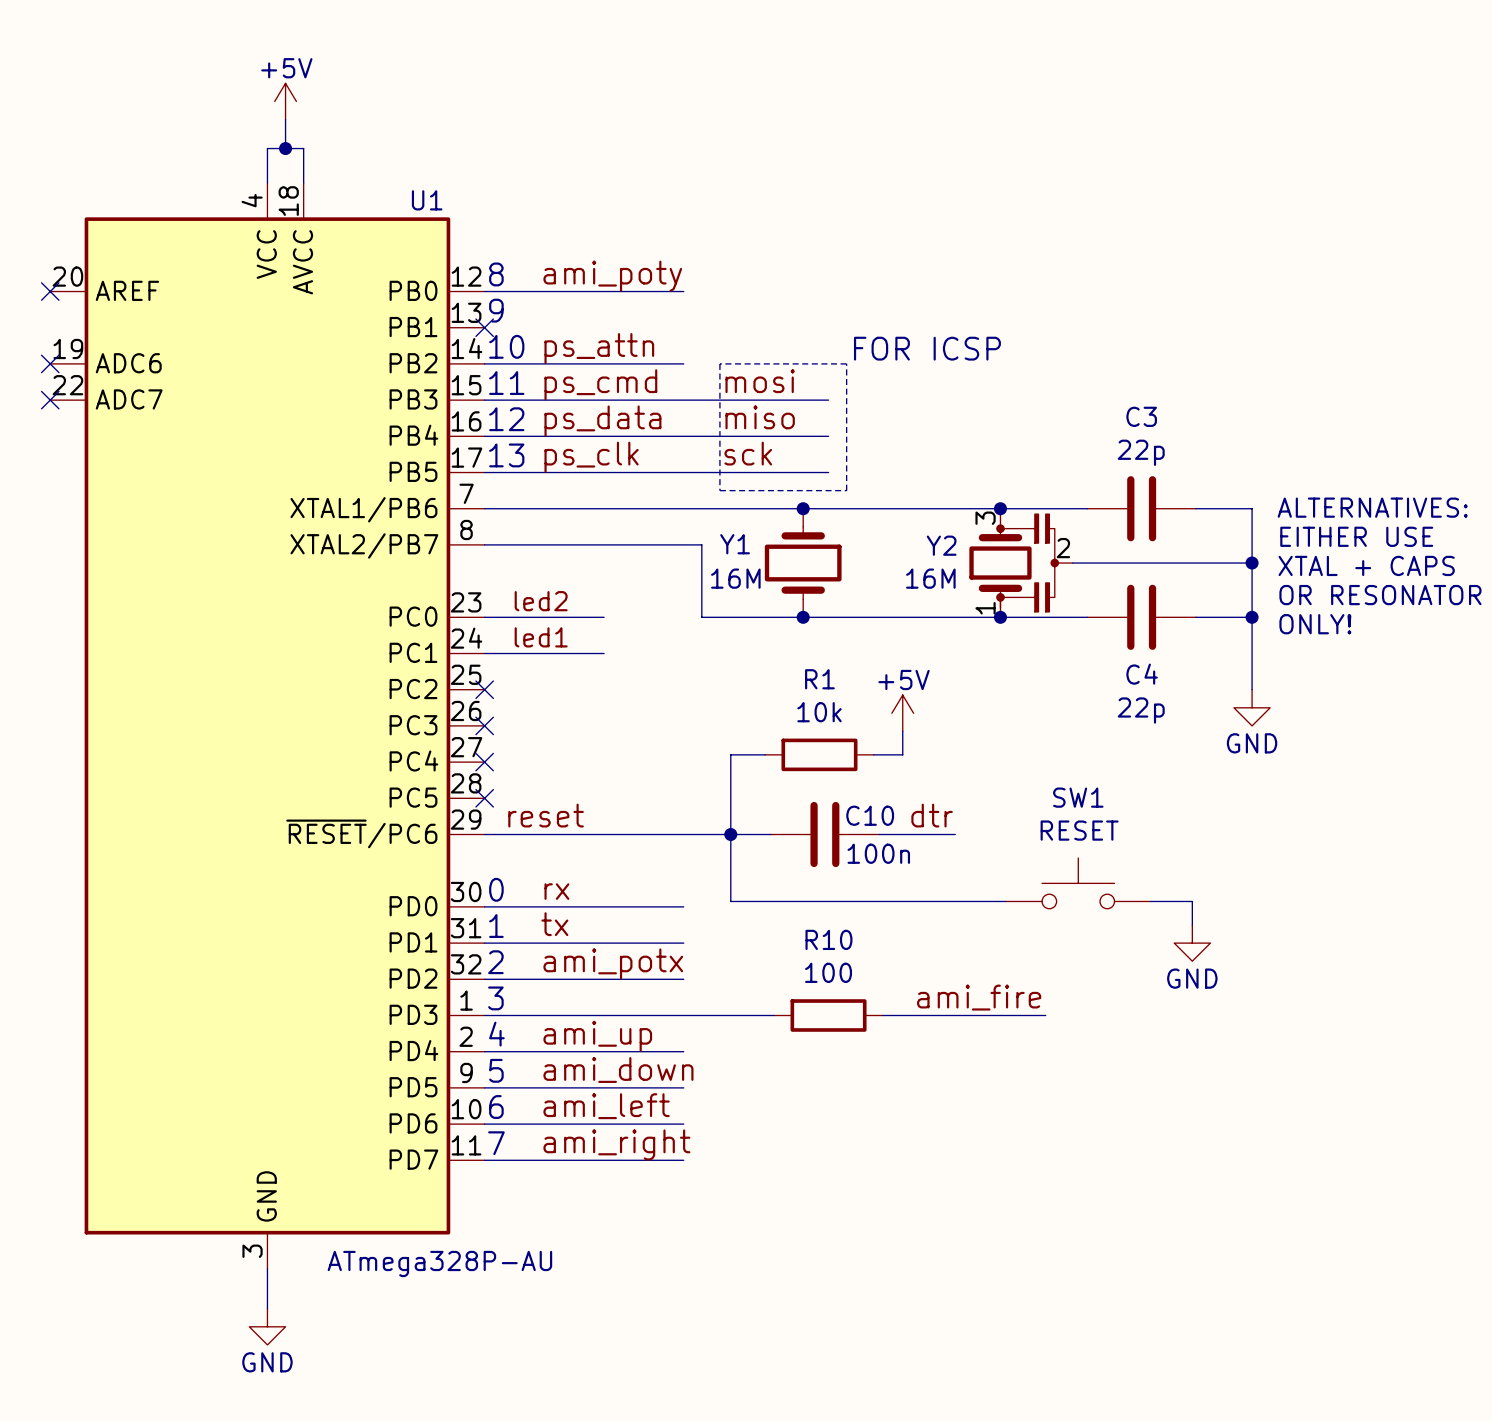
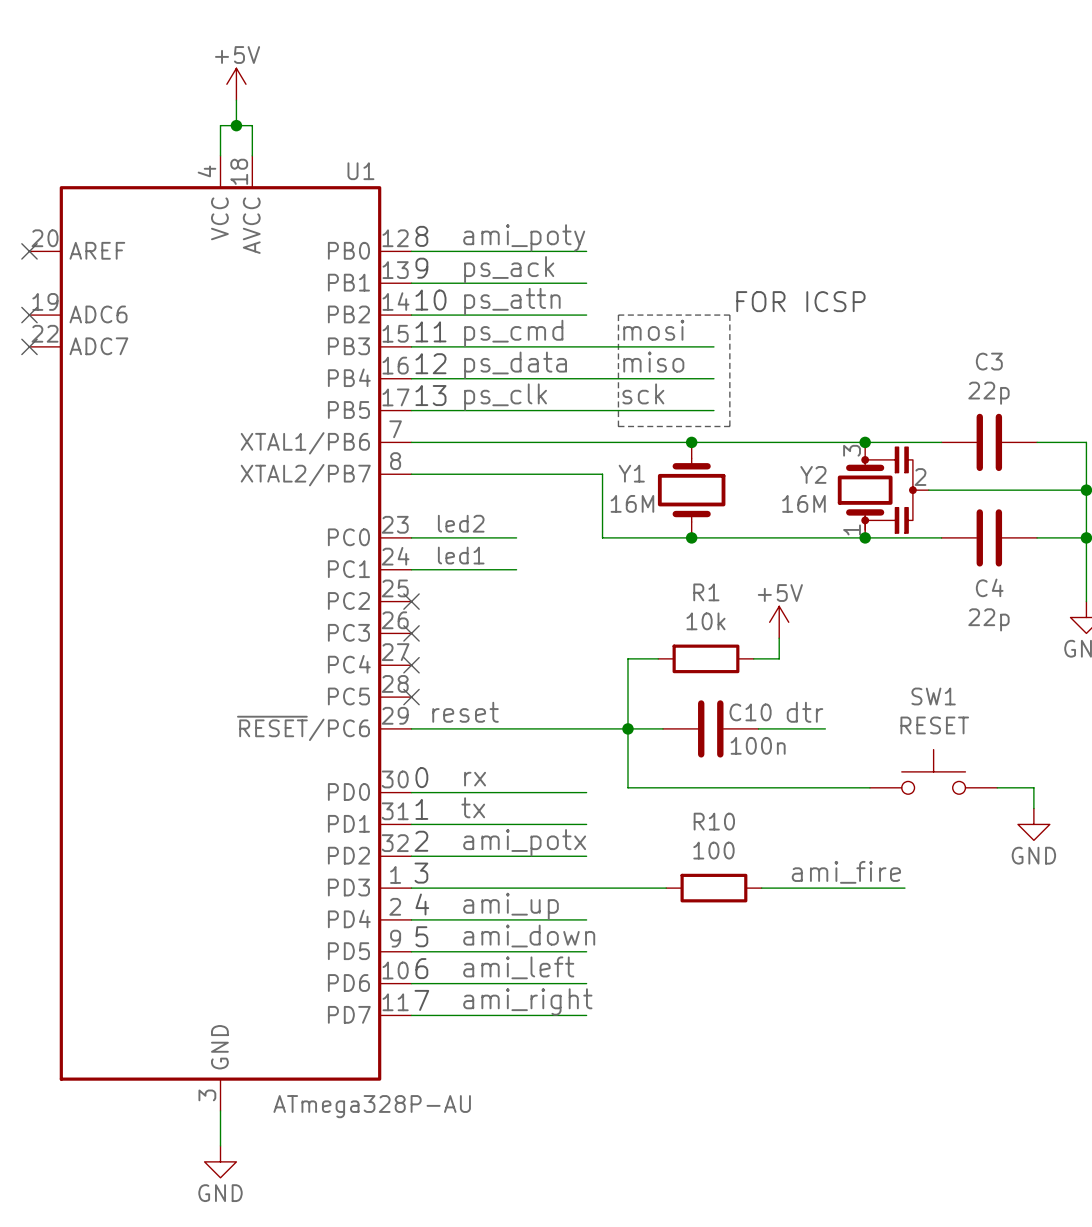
label: none -> ps_ack (509, 269)
wire: none -> (411, 283) (586, 283)
no-connect mark: (484, 327) -> none

